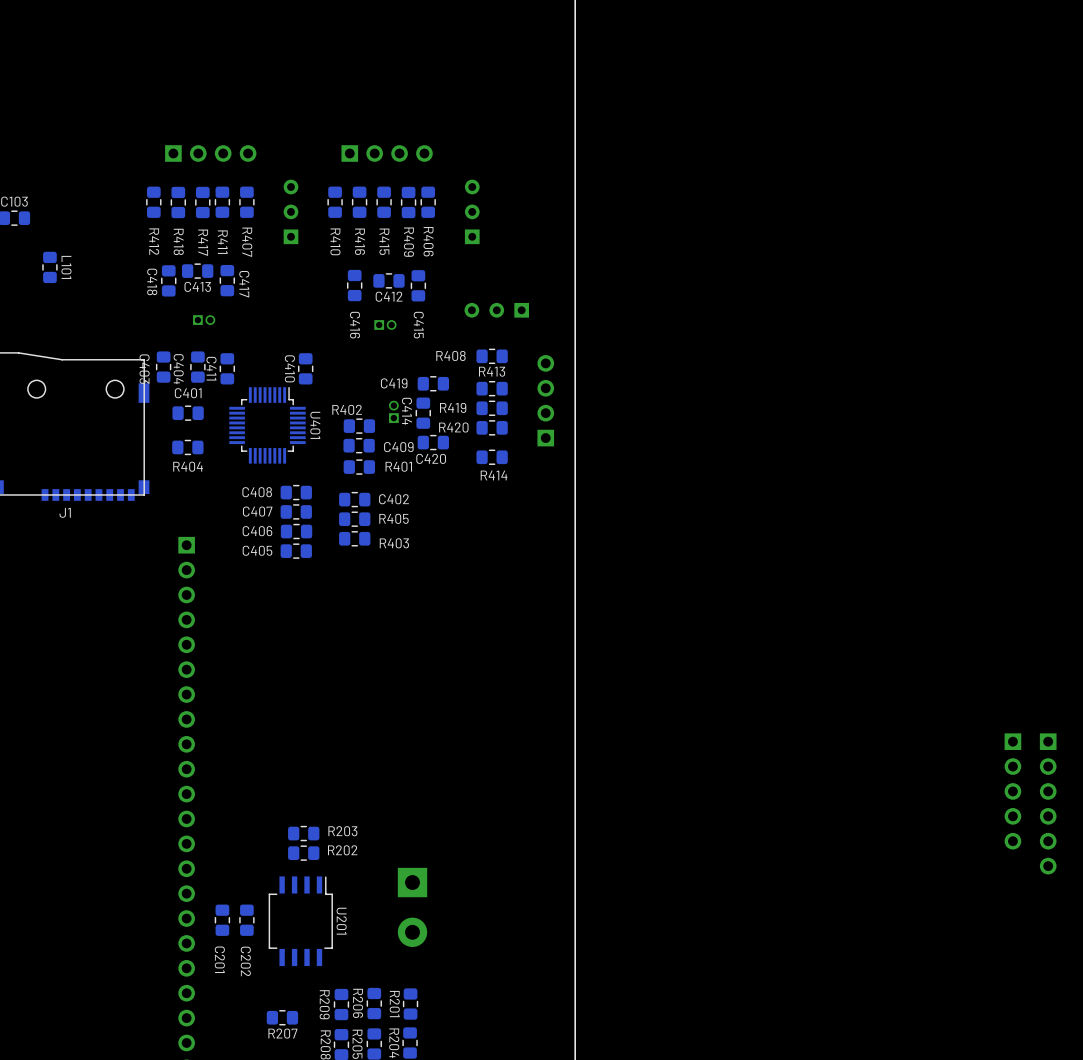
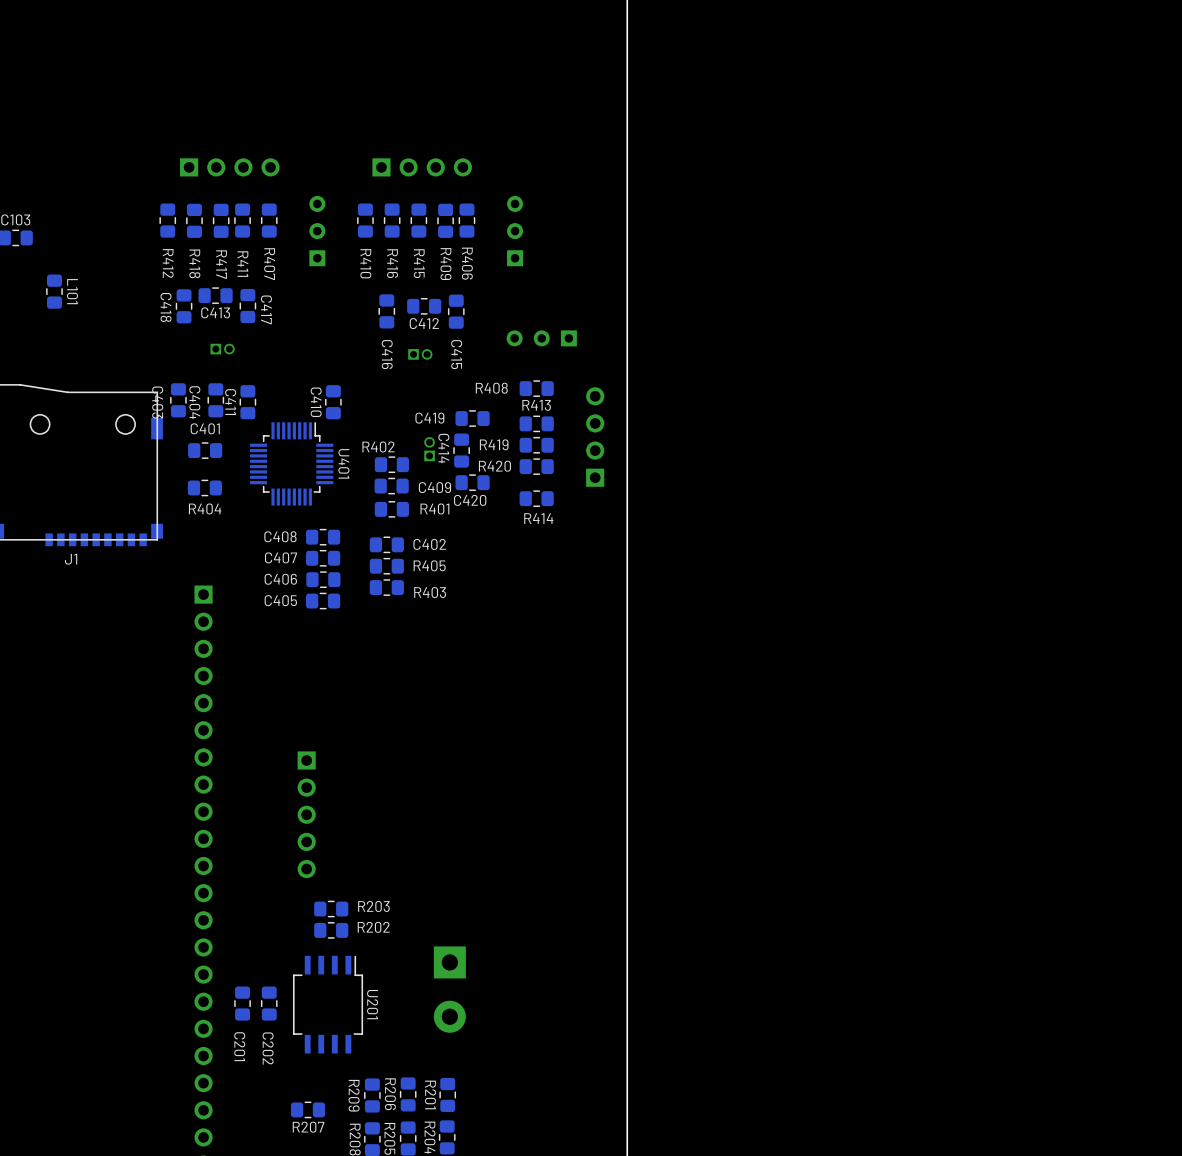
part: none -> (306, 814)
part: (1012, 791) -> none
part: (1048, 803) -> none

